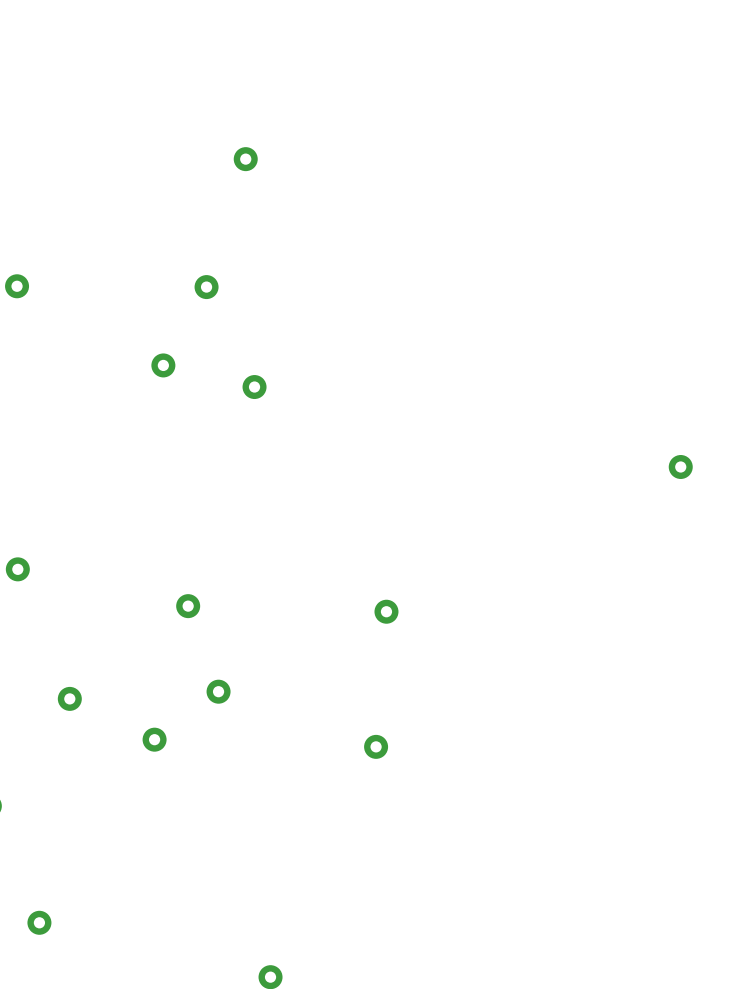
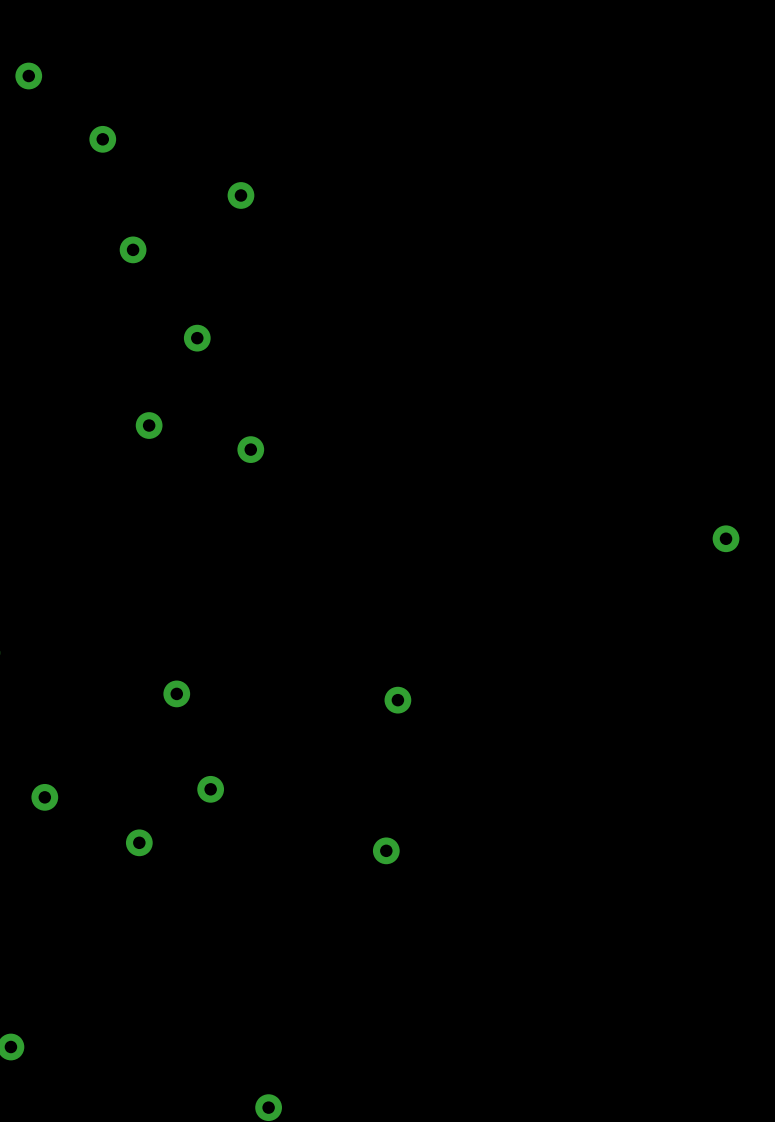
via: none -> (28, 76)
via: none -> (102, 139)
via: none -> (133, 249)

